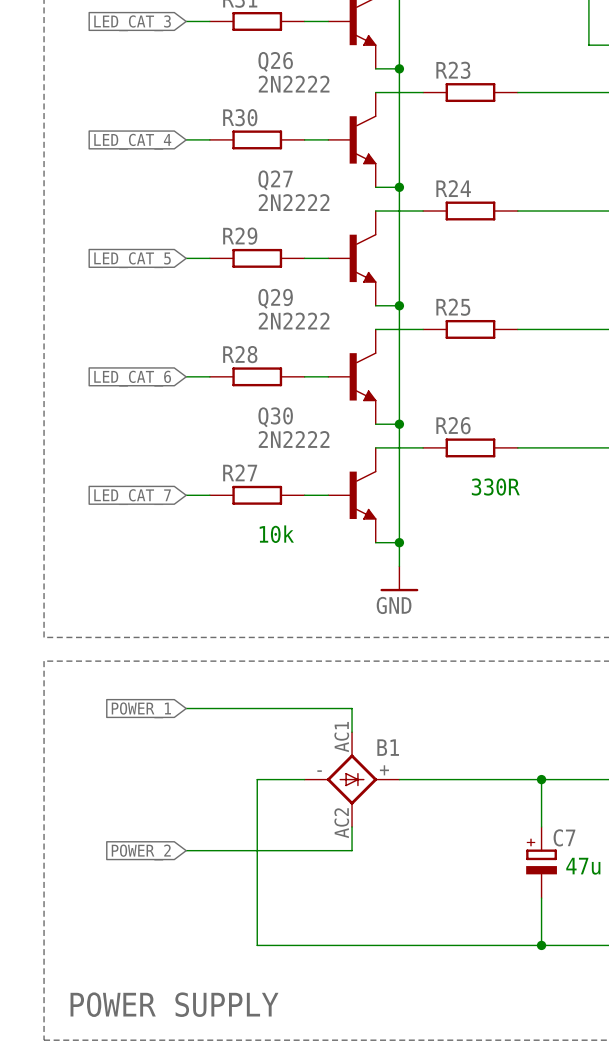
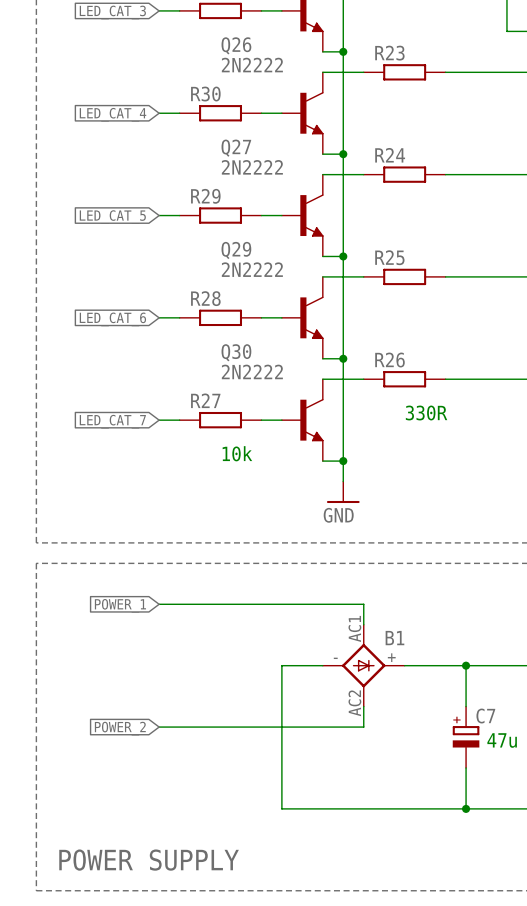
wire: (352, 708) (352, 732) -> (302, 604) (363, 604) (363, 624)
wire: (304, 779) (257, 779) (257, 945) (328, 945) -> (322, 665) (281, 665) (281, 808)
B1 position: (352, 779) -> (363, 665)
wire: (352, 826) (352, 850) -> (363, 706) (363, 727) (302, 727)

